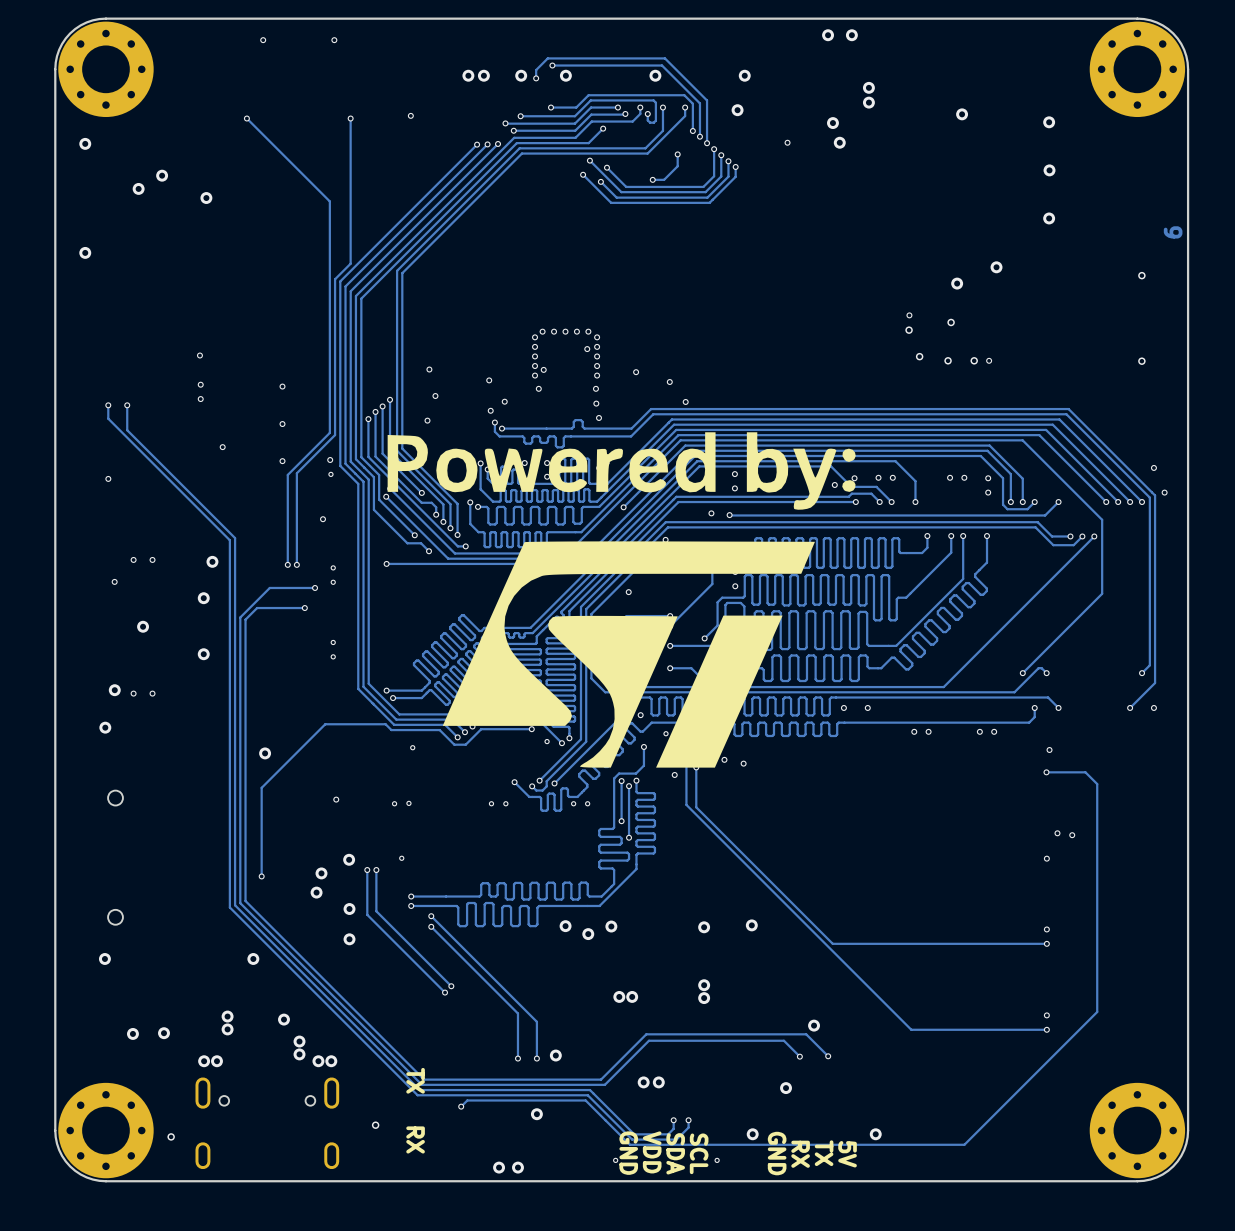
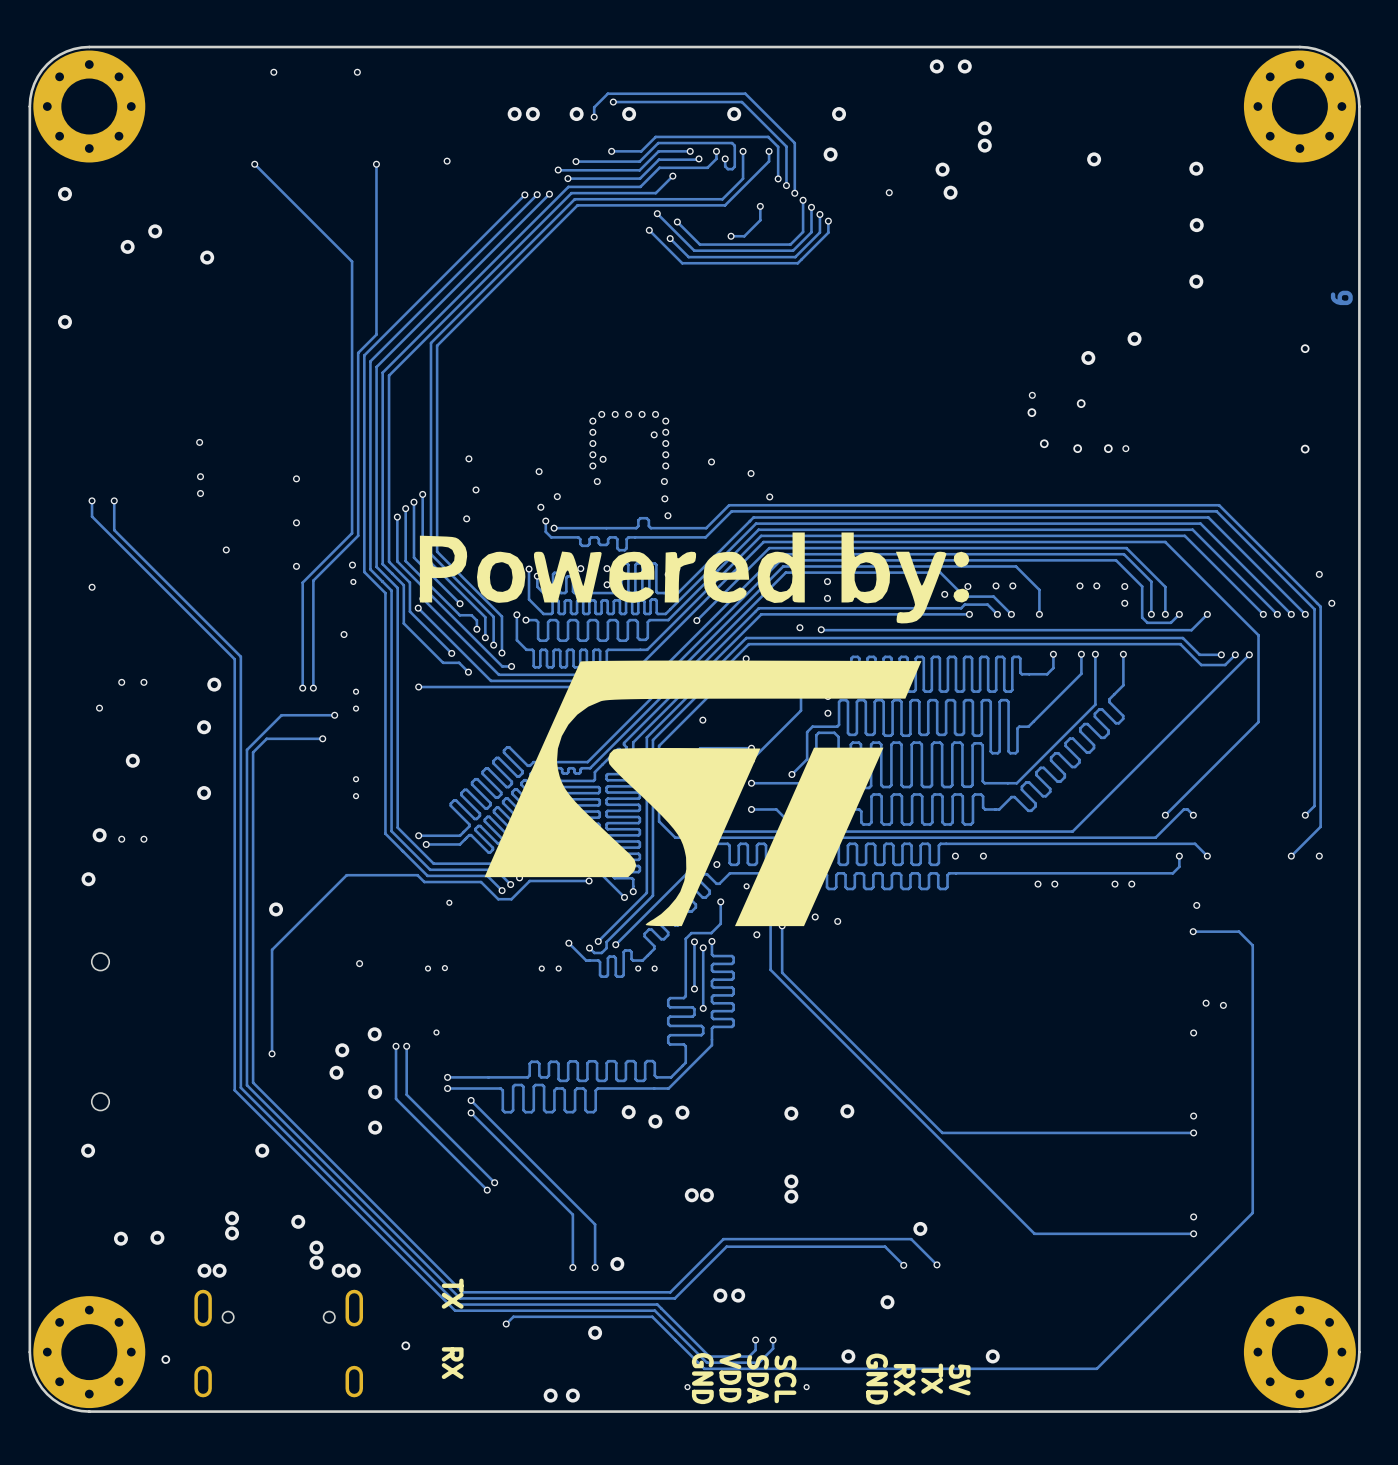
via: (547, 741) -> none

